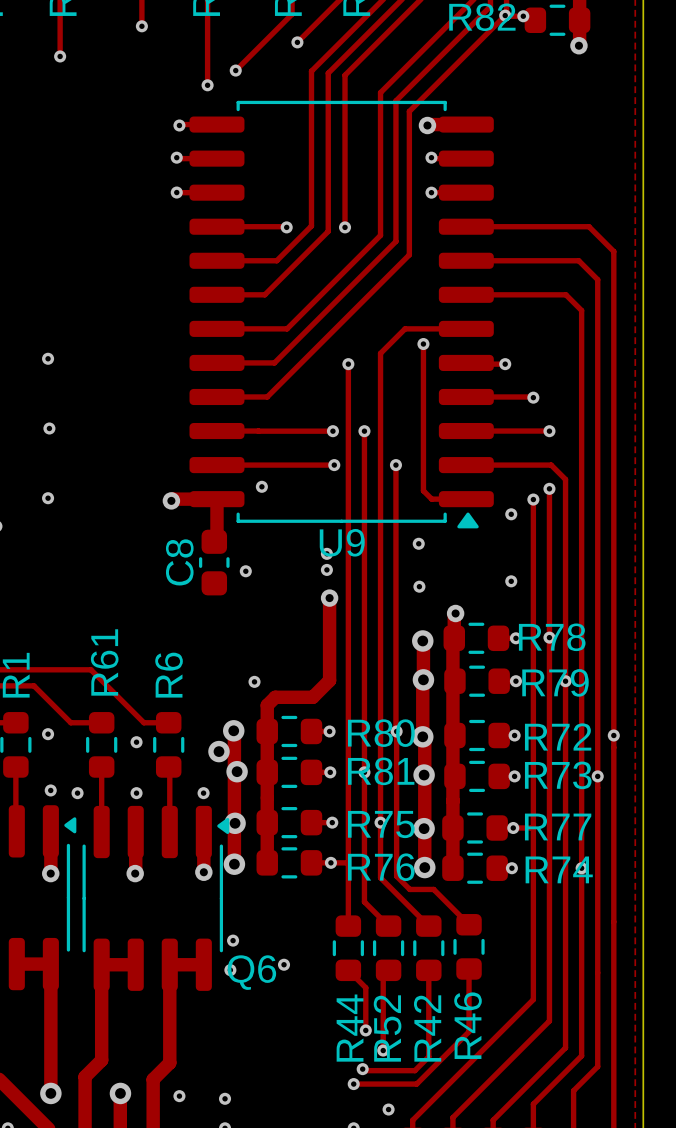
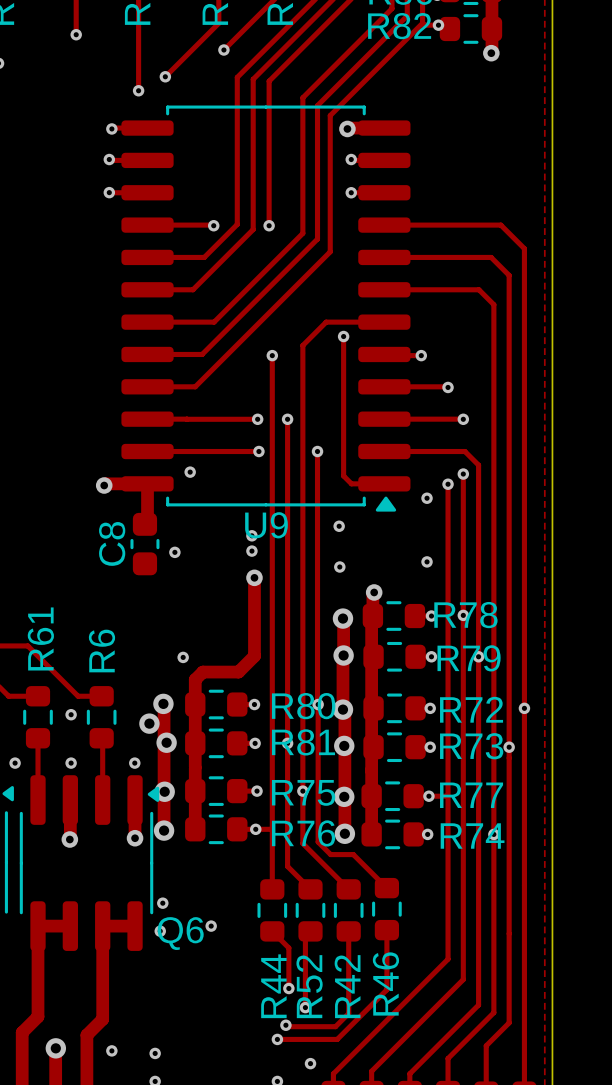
via: (505, 15) -> none

